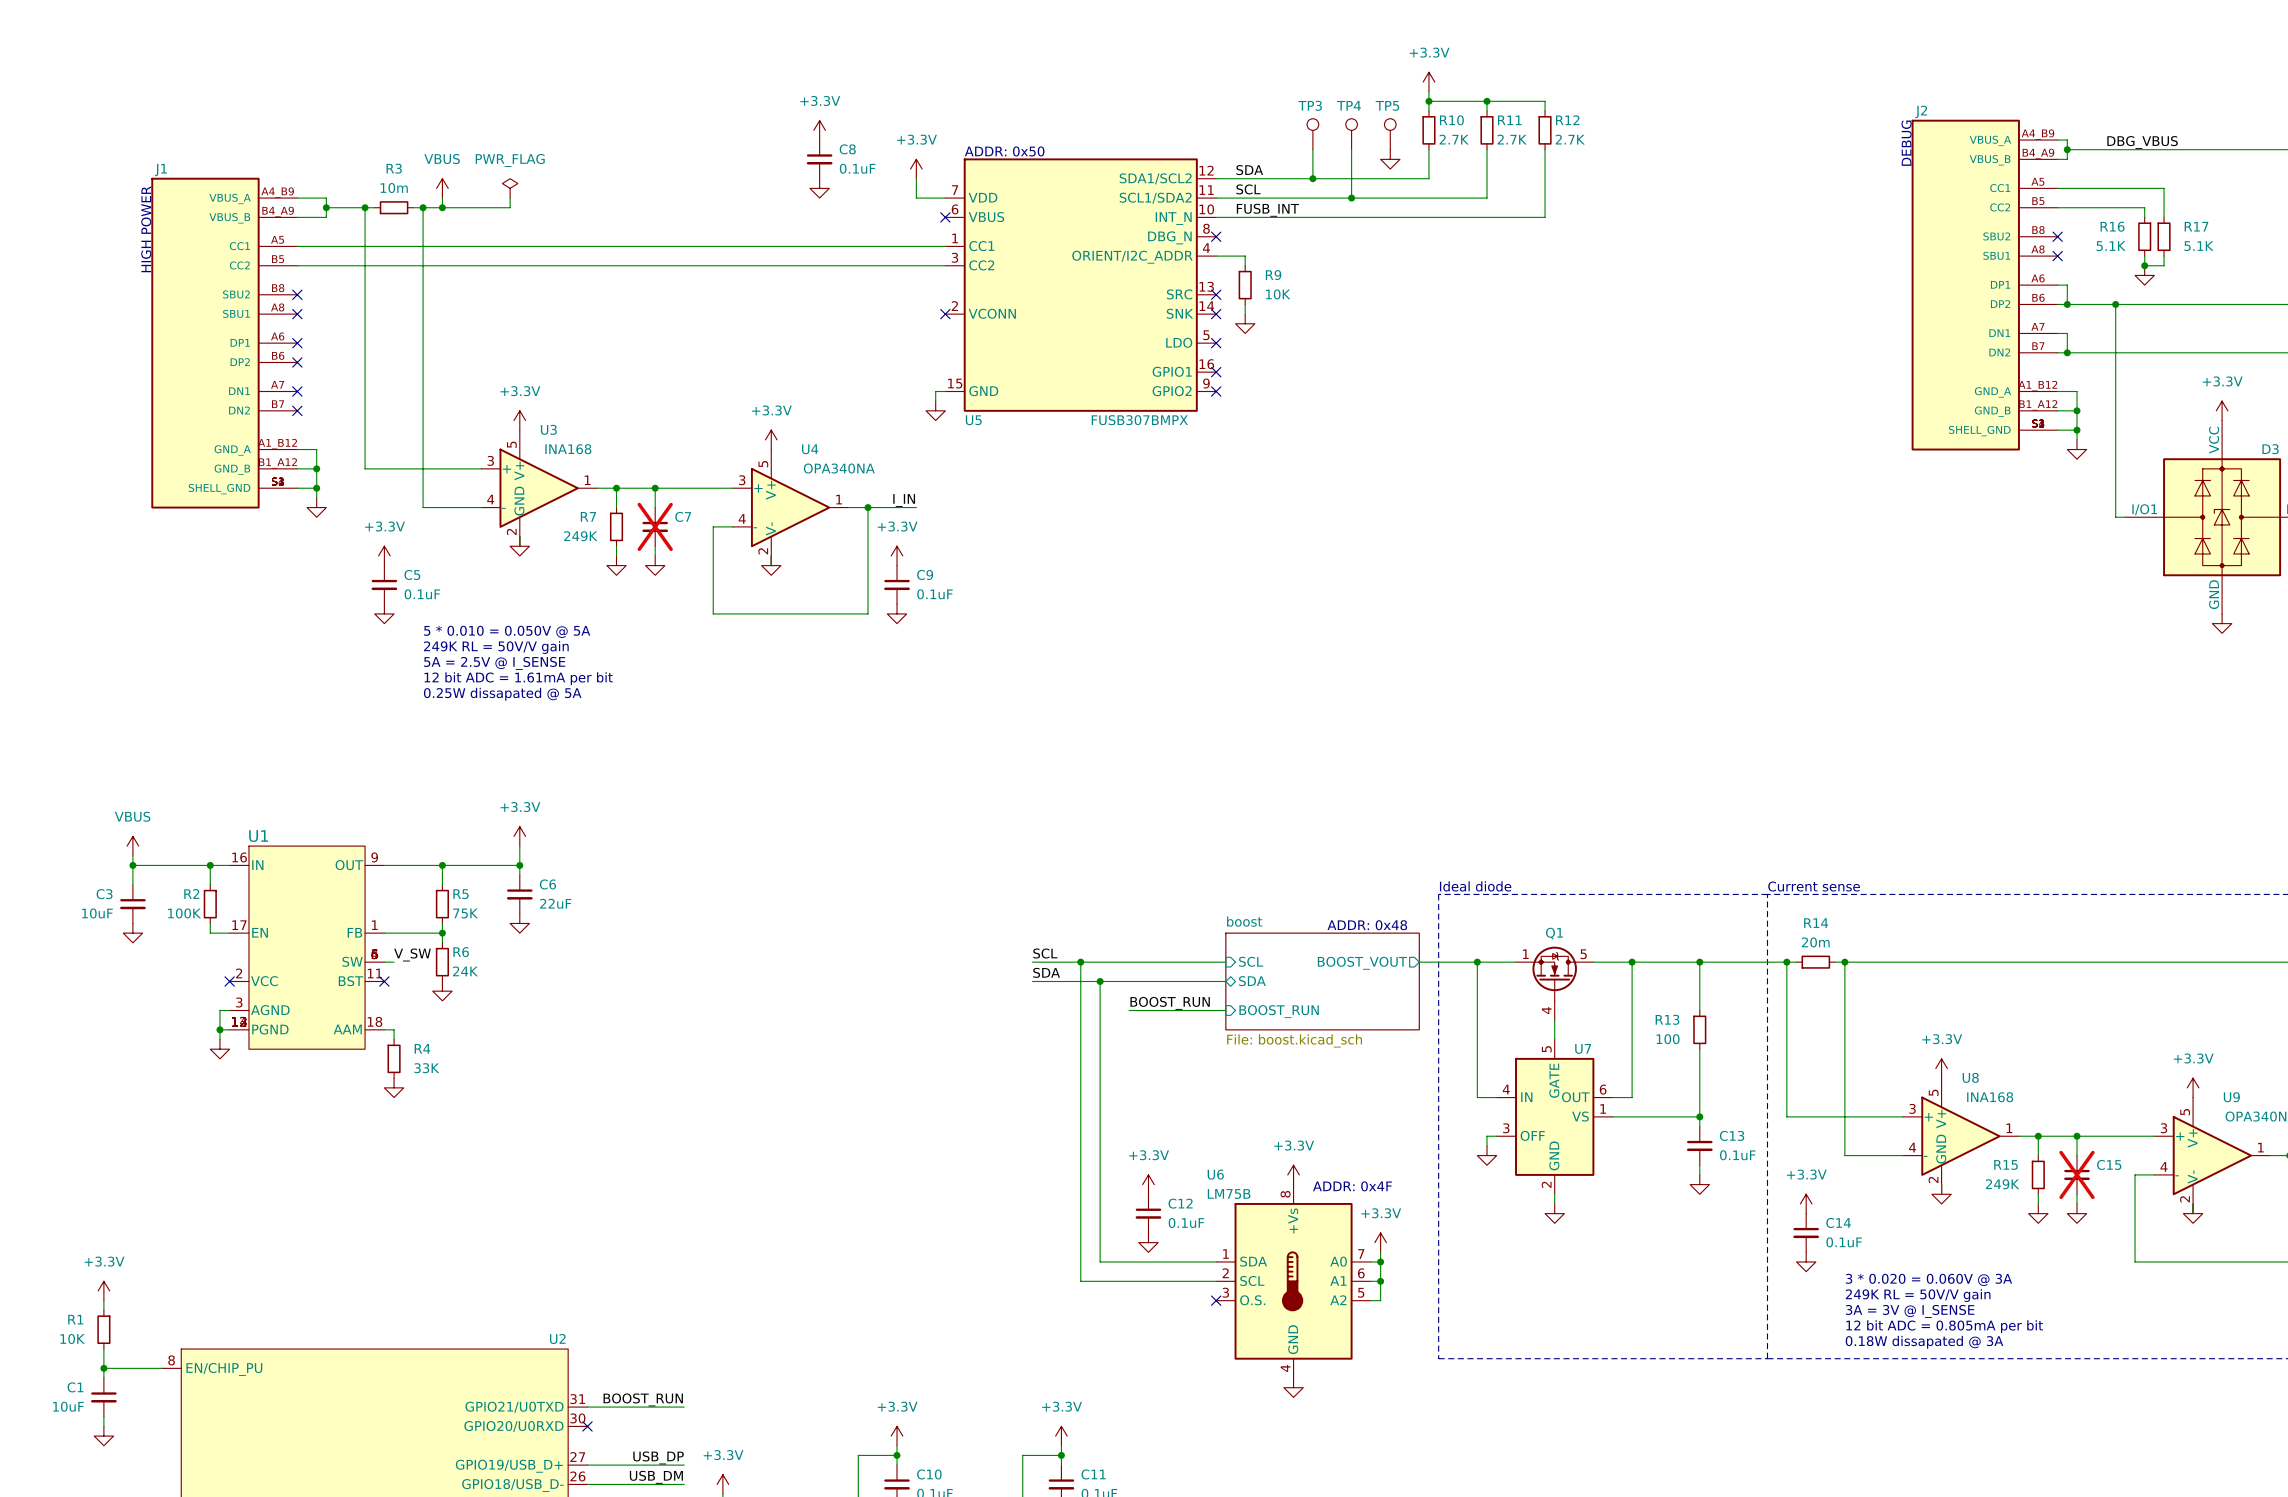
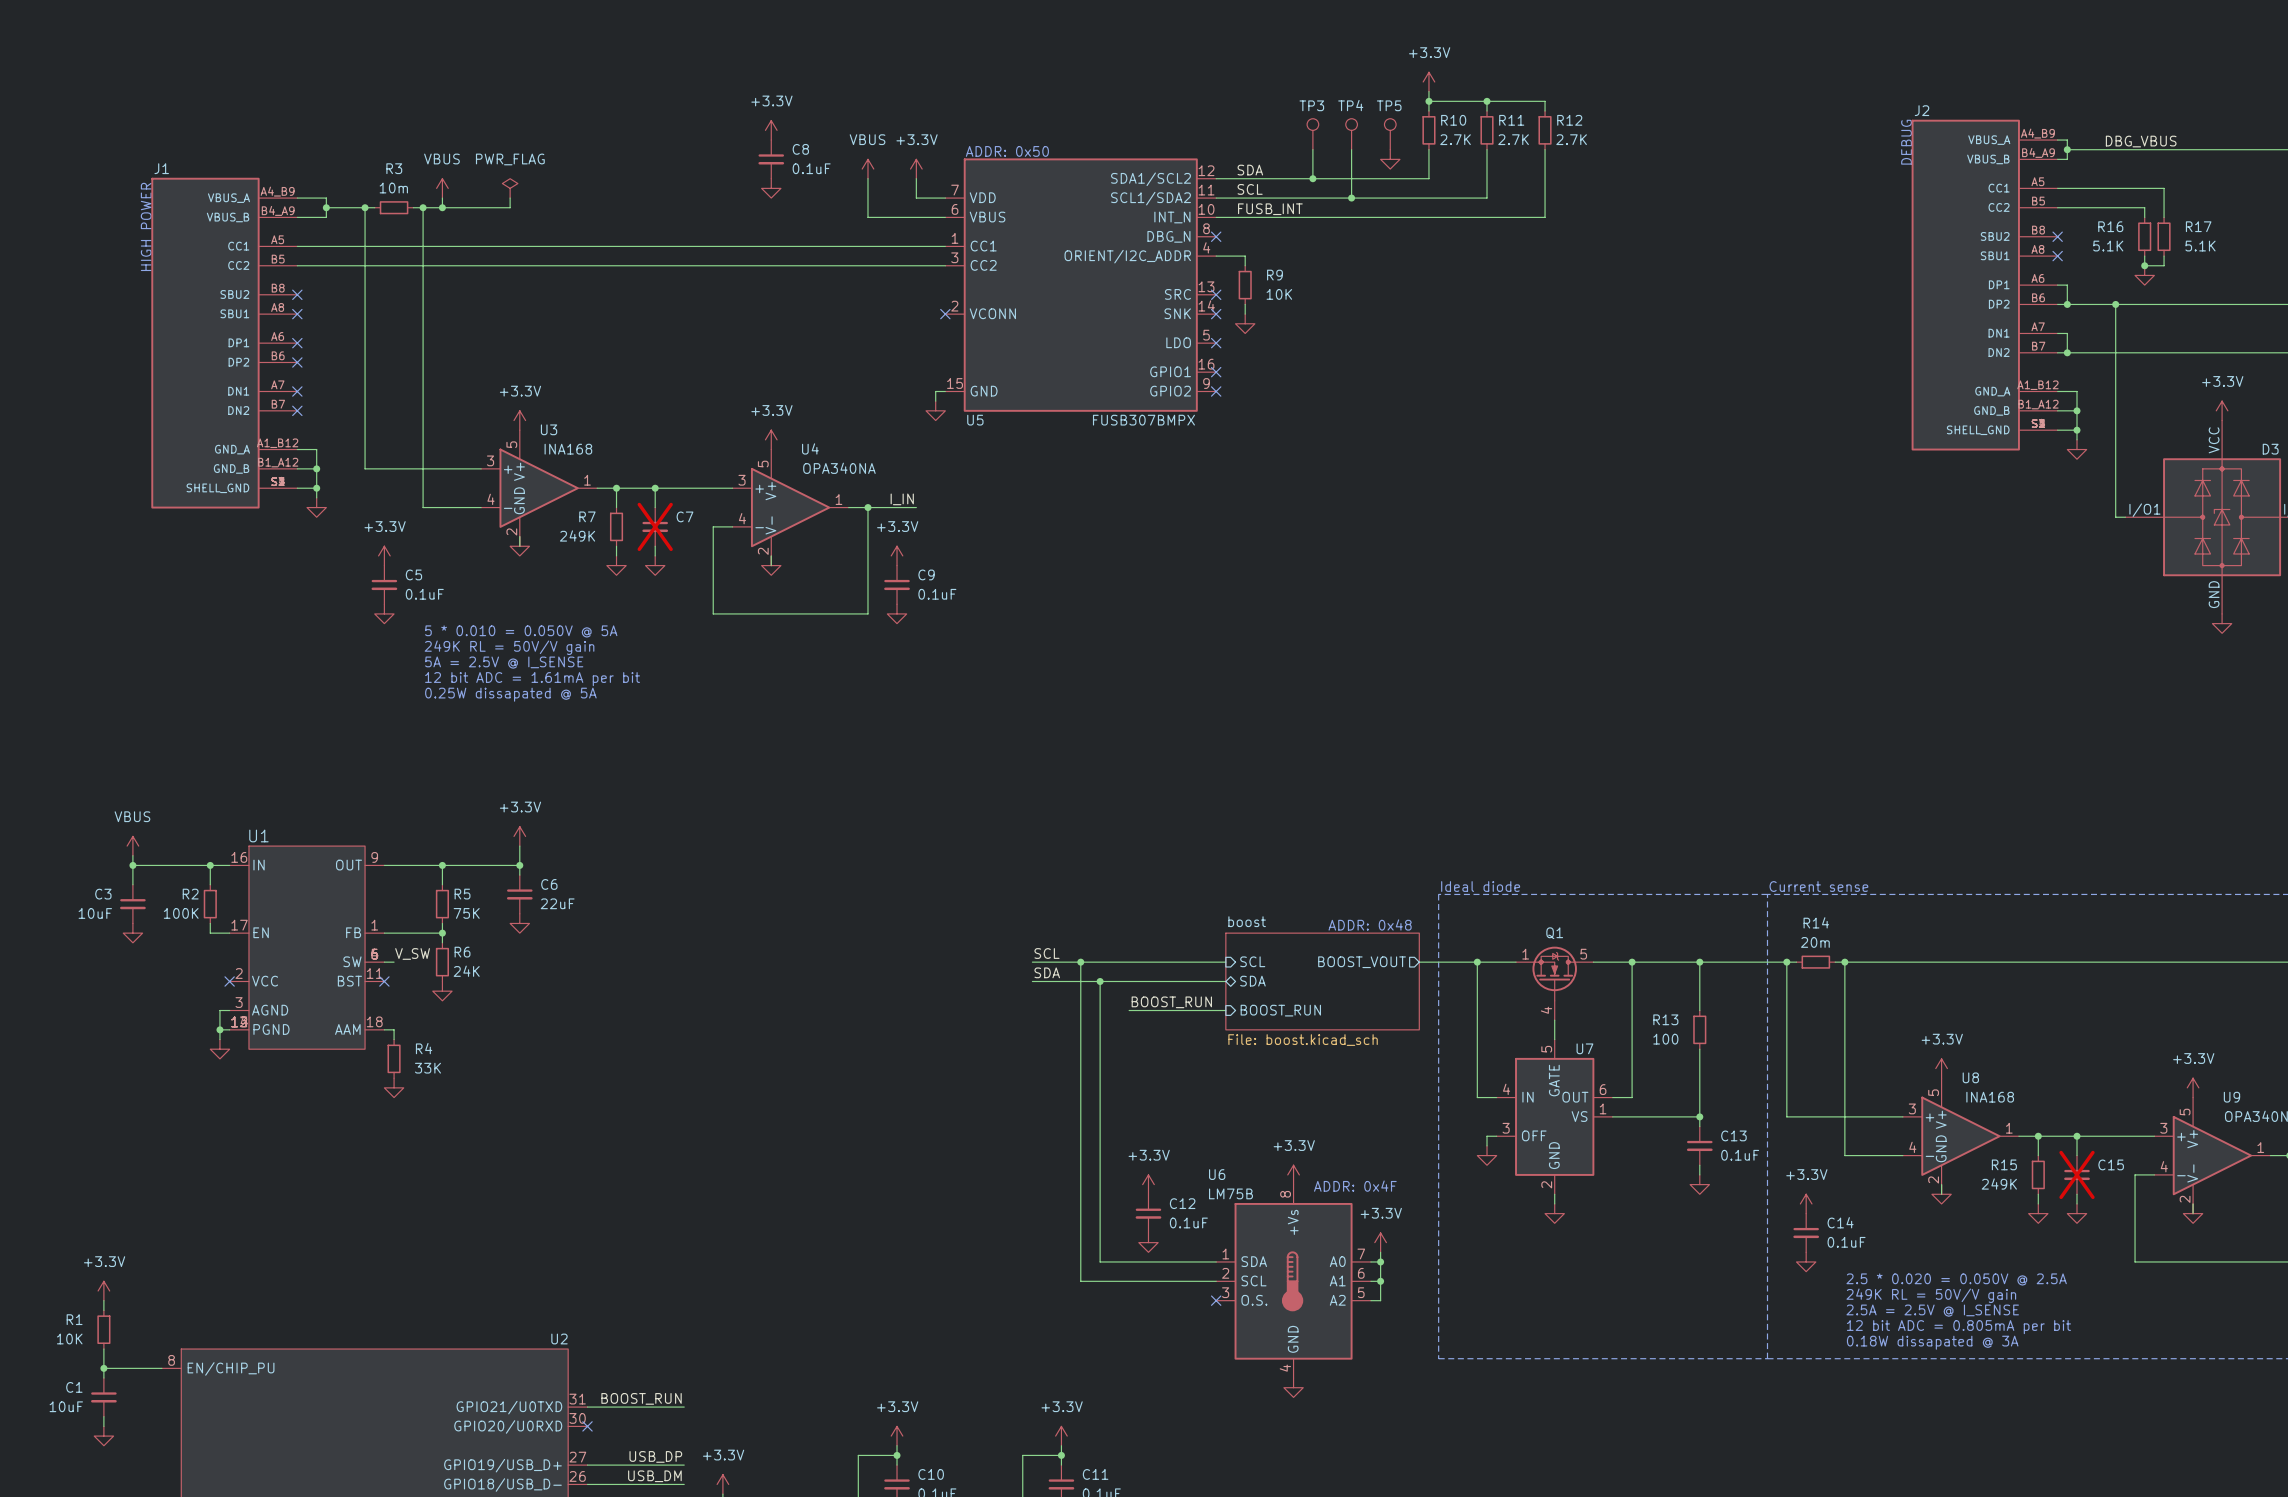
power symbol position: +3.3V (819, 130) -> +3.3V (771, 130)
C8 position: (819, 159) -> (771, 159)
power symbol: none -> VBUS (867, 169)
wire: none -> (867, 178) (867, 217) (945, 217)
power symbol position: (819, 188) -> (771, 188)
no-connect mark: (945, 217) -> none
text: 3 * 0.020 = 0.060V @ 3A (1928, 1279) -> 2.5 * 0.020 = 0.050V @ 2.5A (1956, 1279)
text: 3A = 3V @ I_SENSE (1910, 1311) -> 2.5A = 2.5V @ I_SENSE (1932, 1310)

